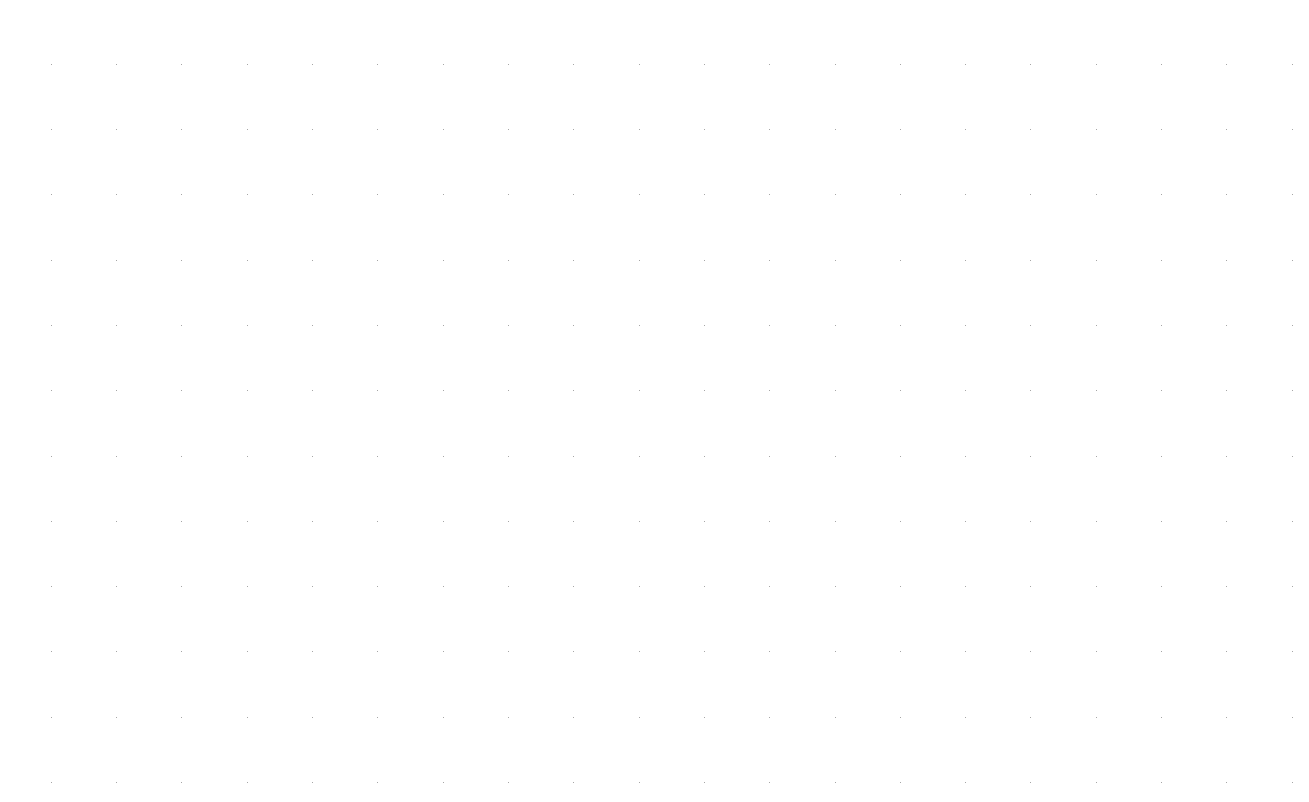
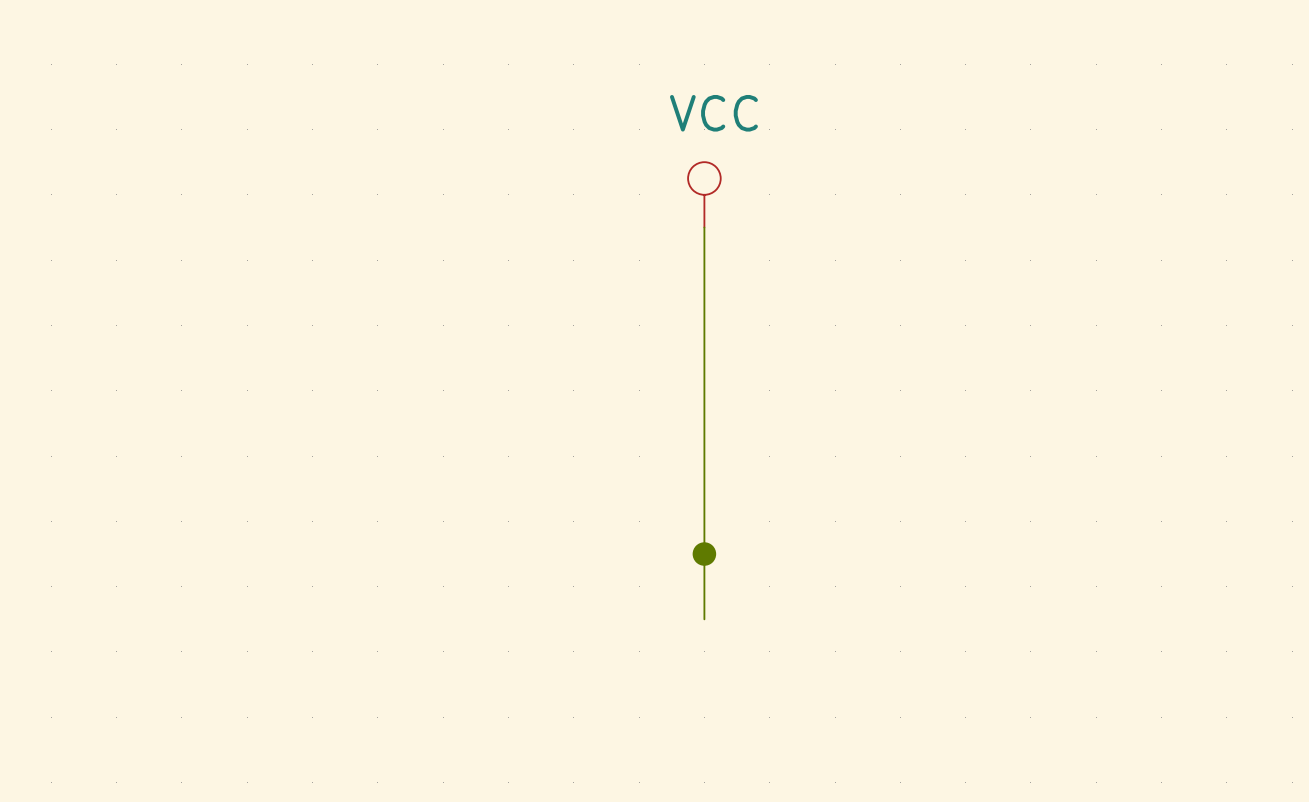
power symbol: none -> VCC (704, 194)
wire: none -> (704, 227) (704, 619)
junction: none -> (704, 554)

